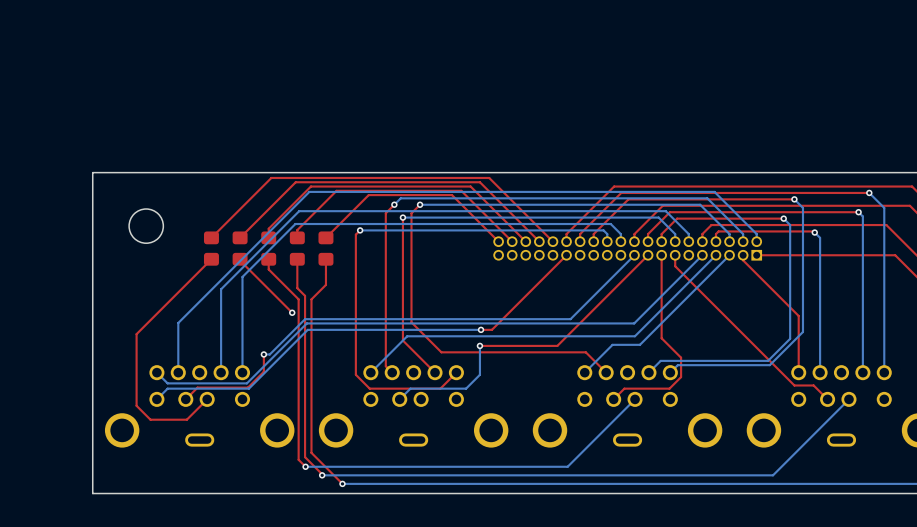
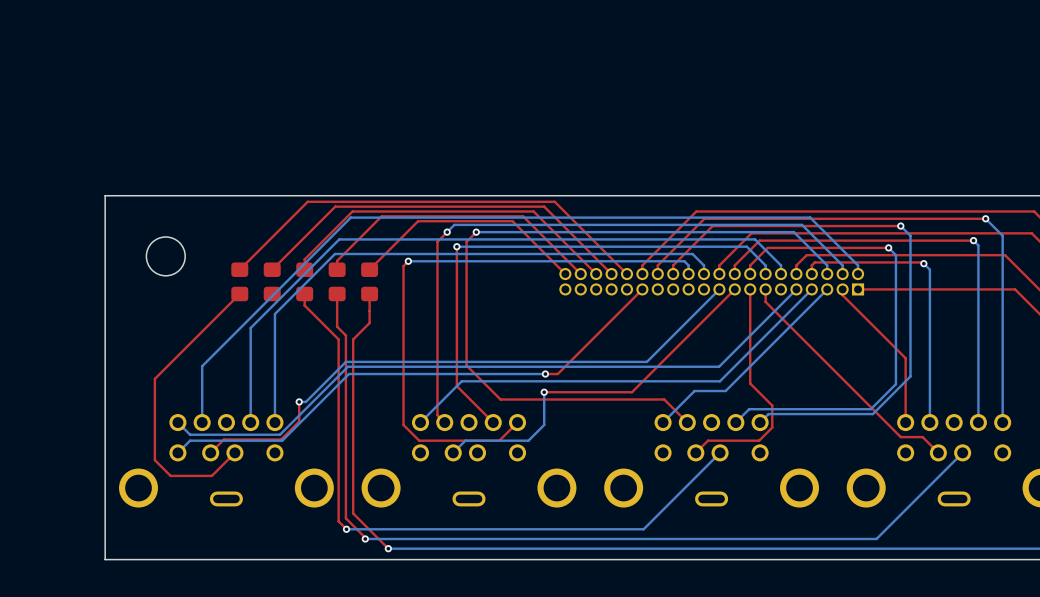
top track: (240, 259) (292, 312) -> none
via: (292, 312) -> none

